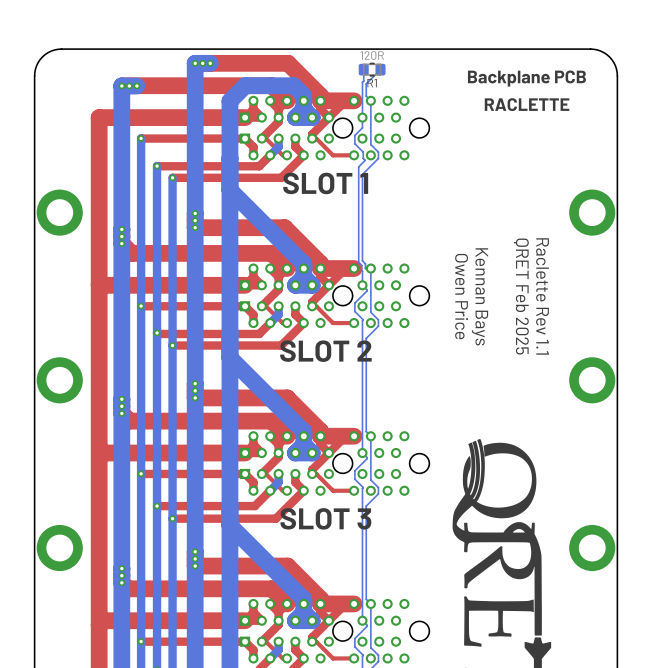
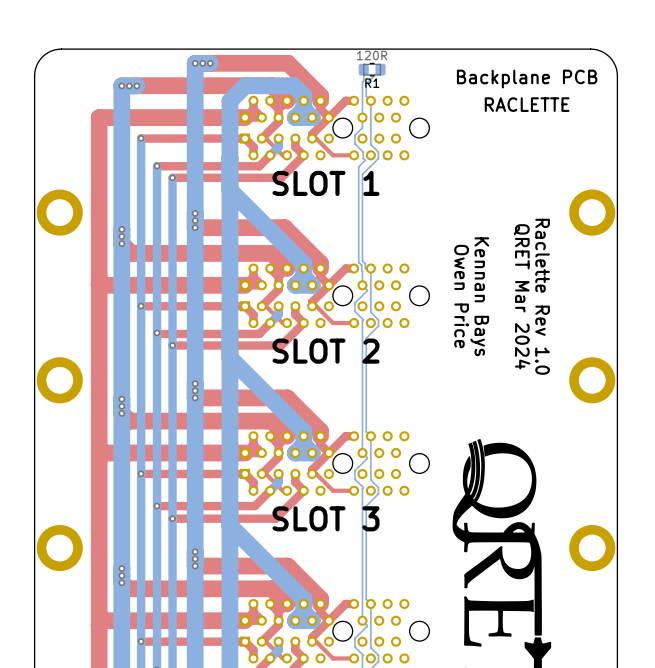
top track: (354, 100) (320, 100) -> none
top track: (354, 268) (320, 268) -> none
text: QRET Feb 2025 (521, 296) -> QRET Mar 2024 (522, 296)
text: Raclette Rev 1.1 (542, 296) -> Raclette Rev 1.0 (542, 296)
top track: (354, 436) (320, 436) -> none
top track: (354, 603) (320, 603) -> none

